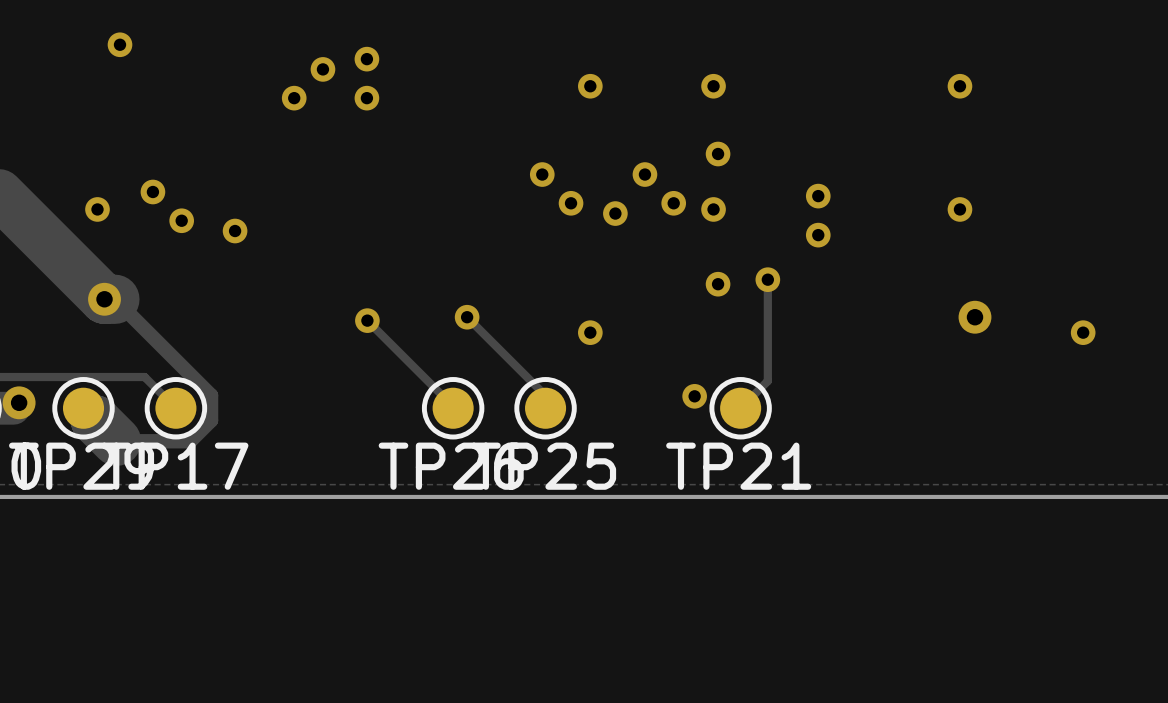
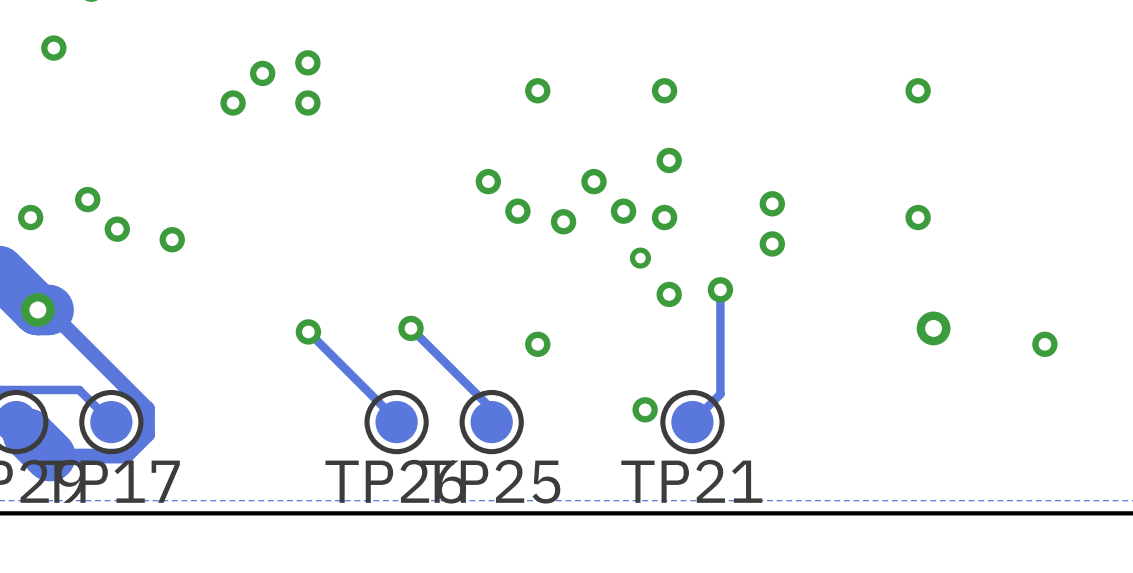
via: none -> (640, 258)

